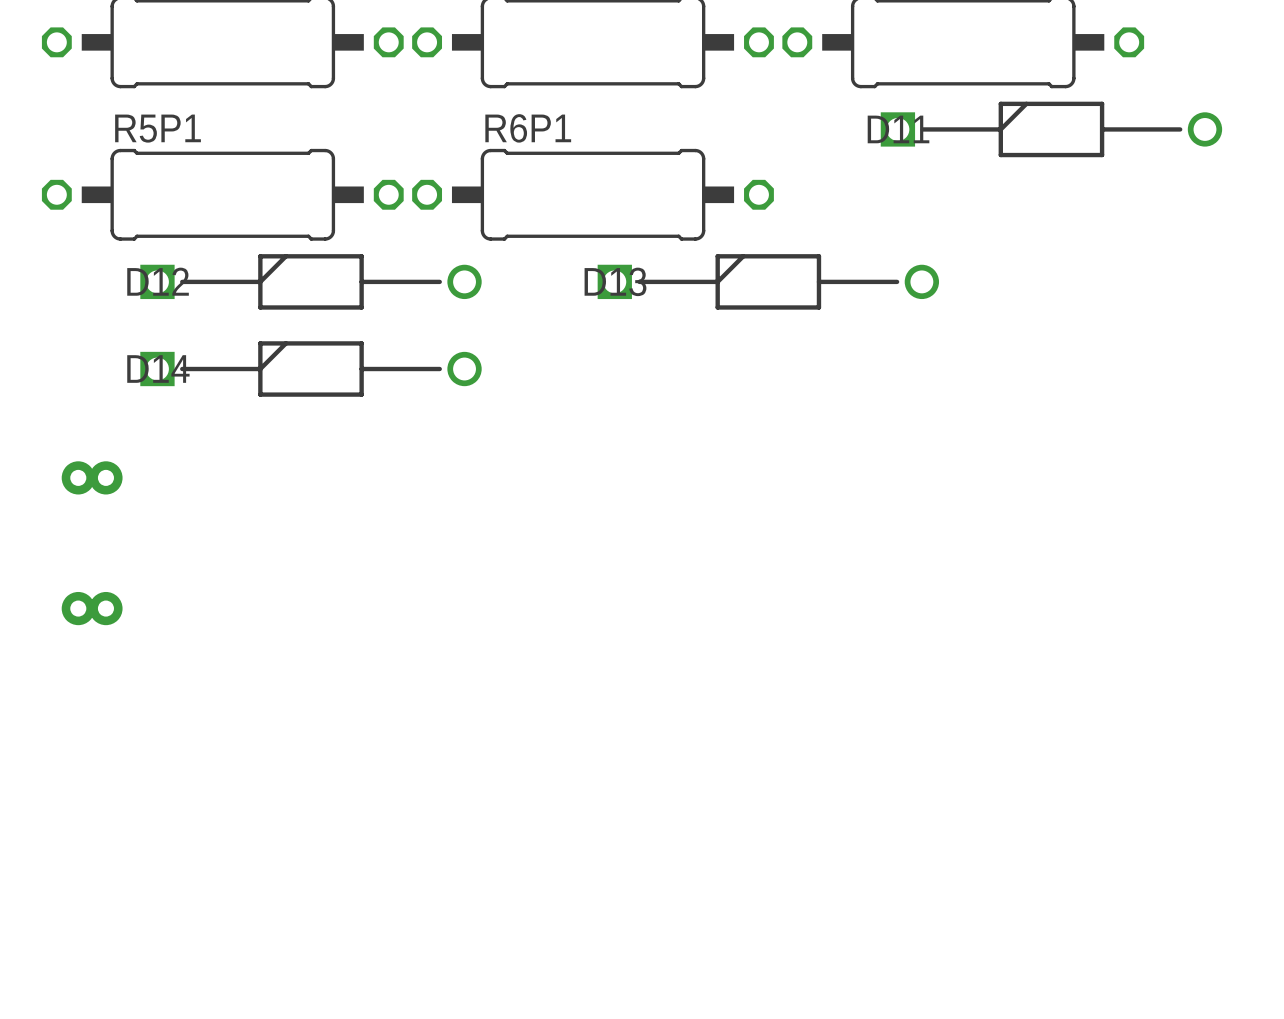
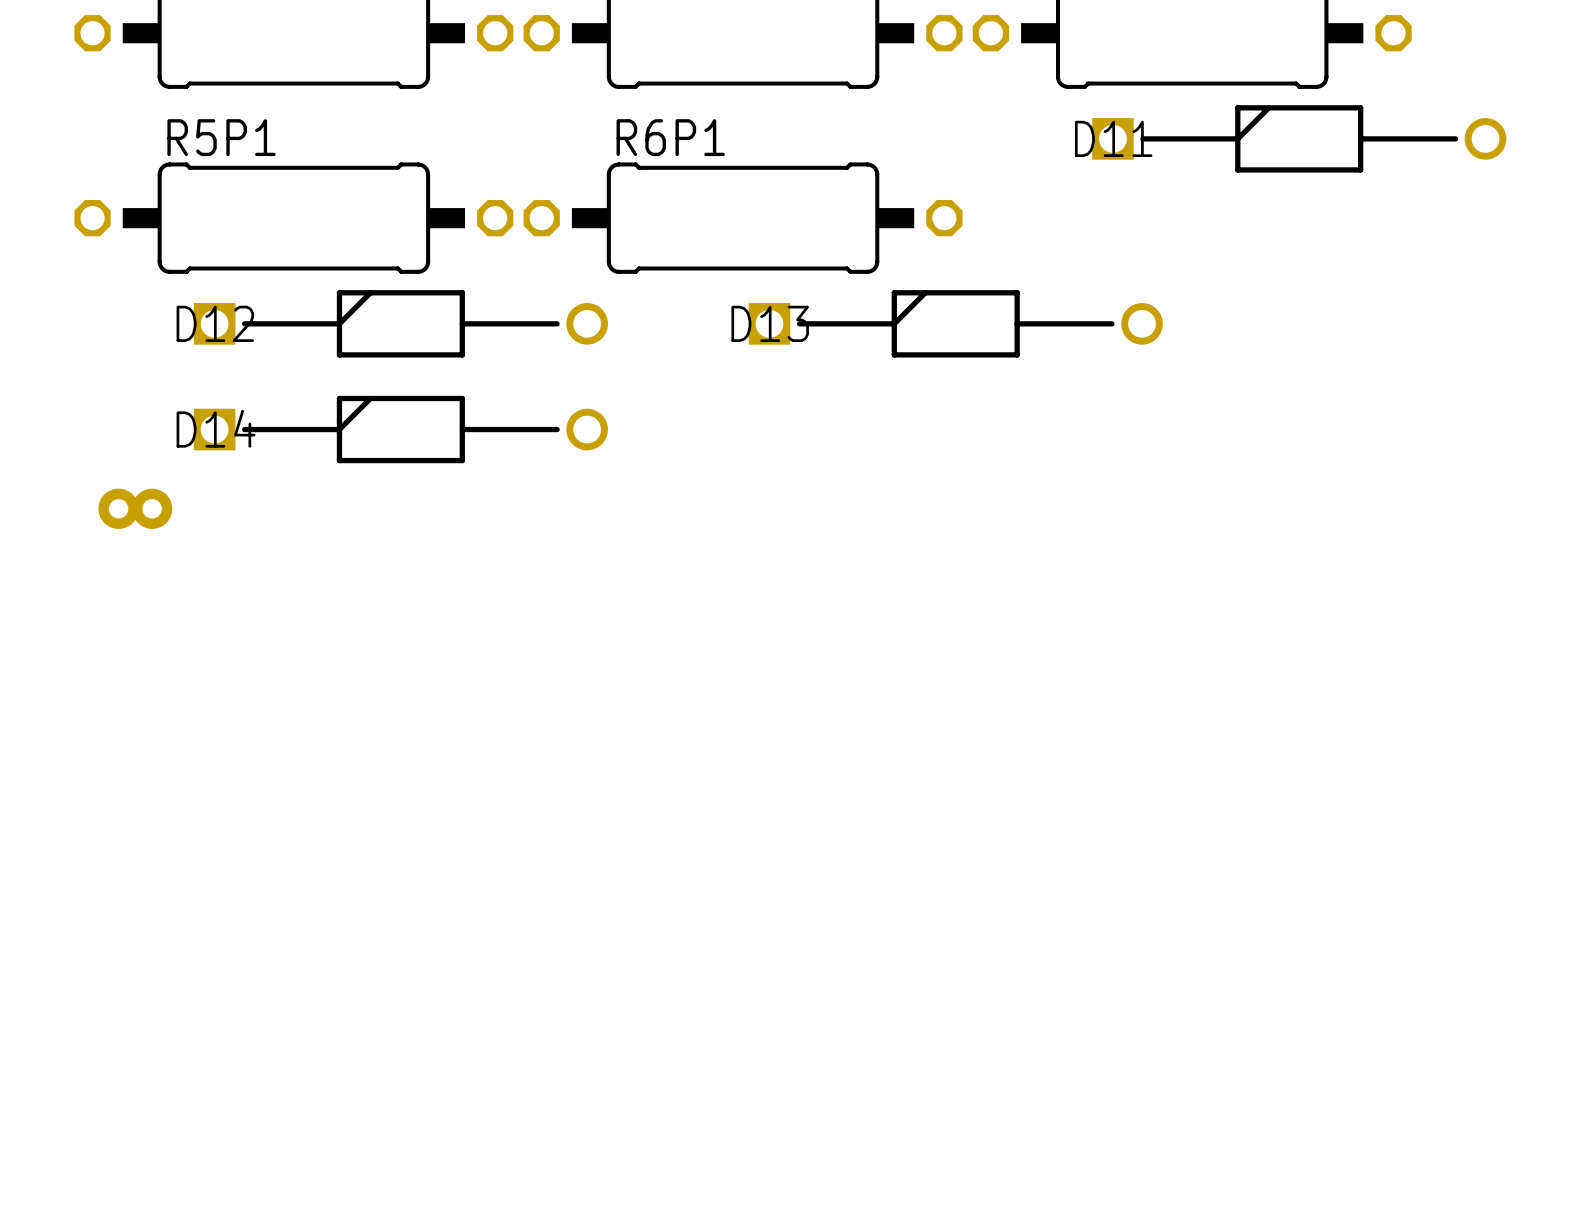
part position: (92, 477) -> (135, 508)
part: (92, 608) -> none

